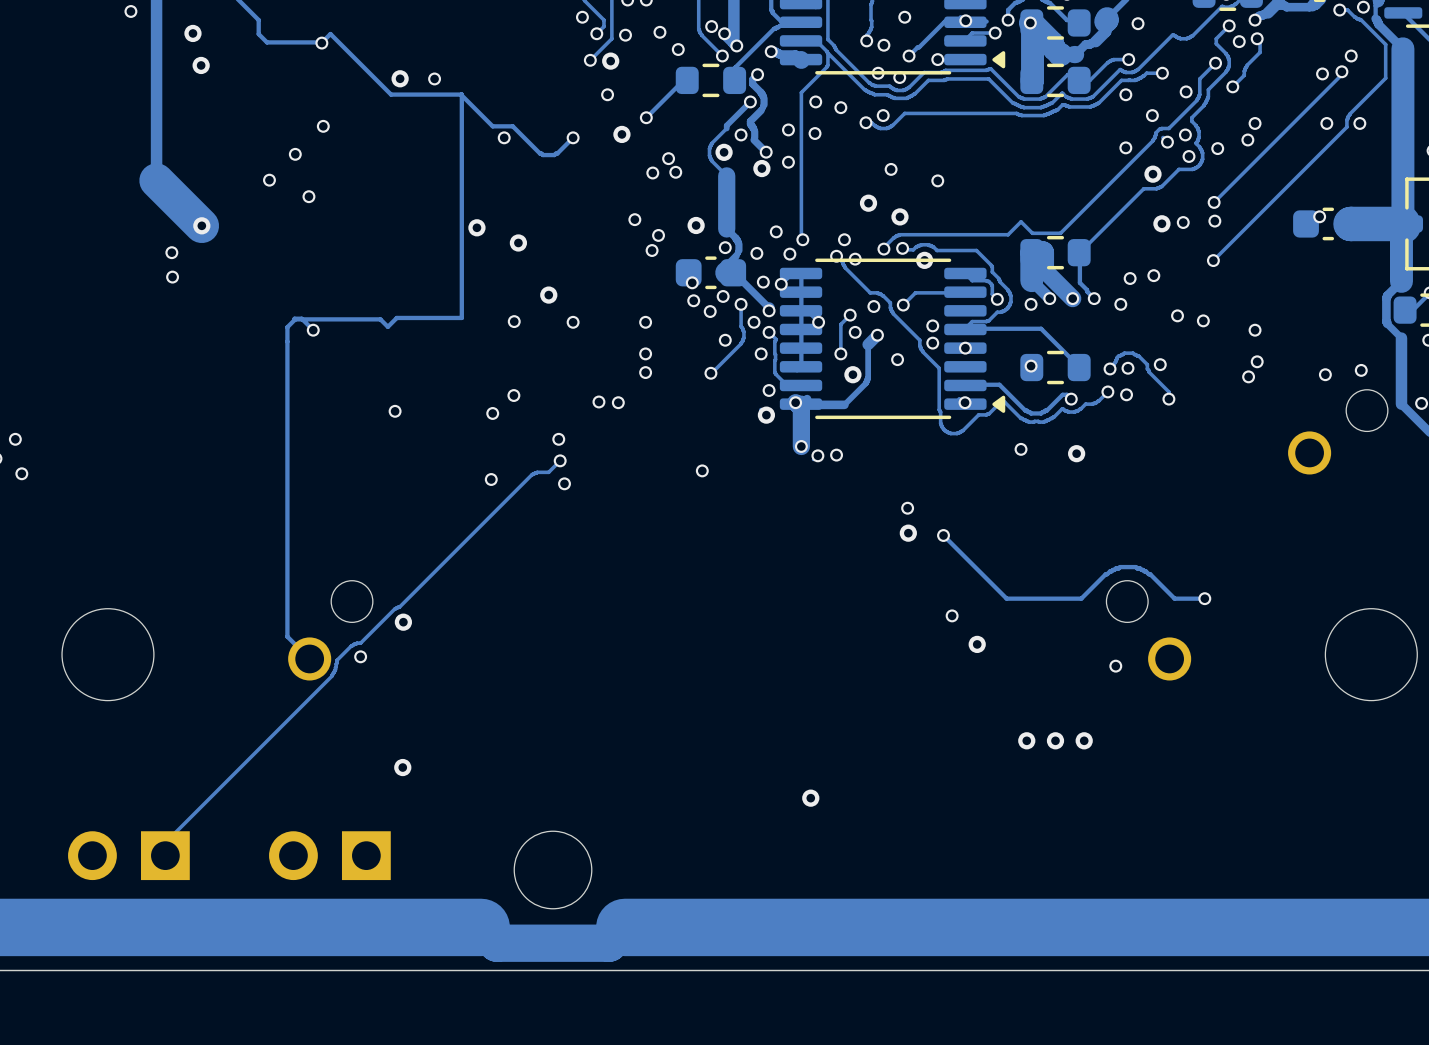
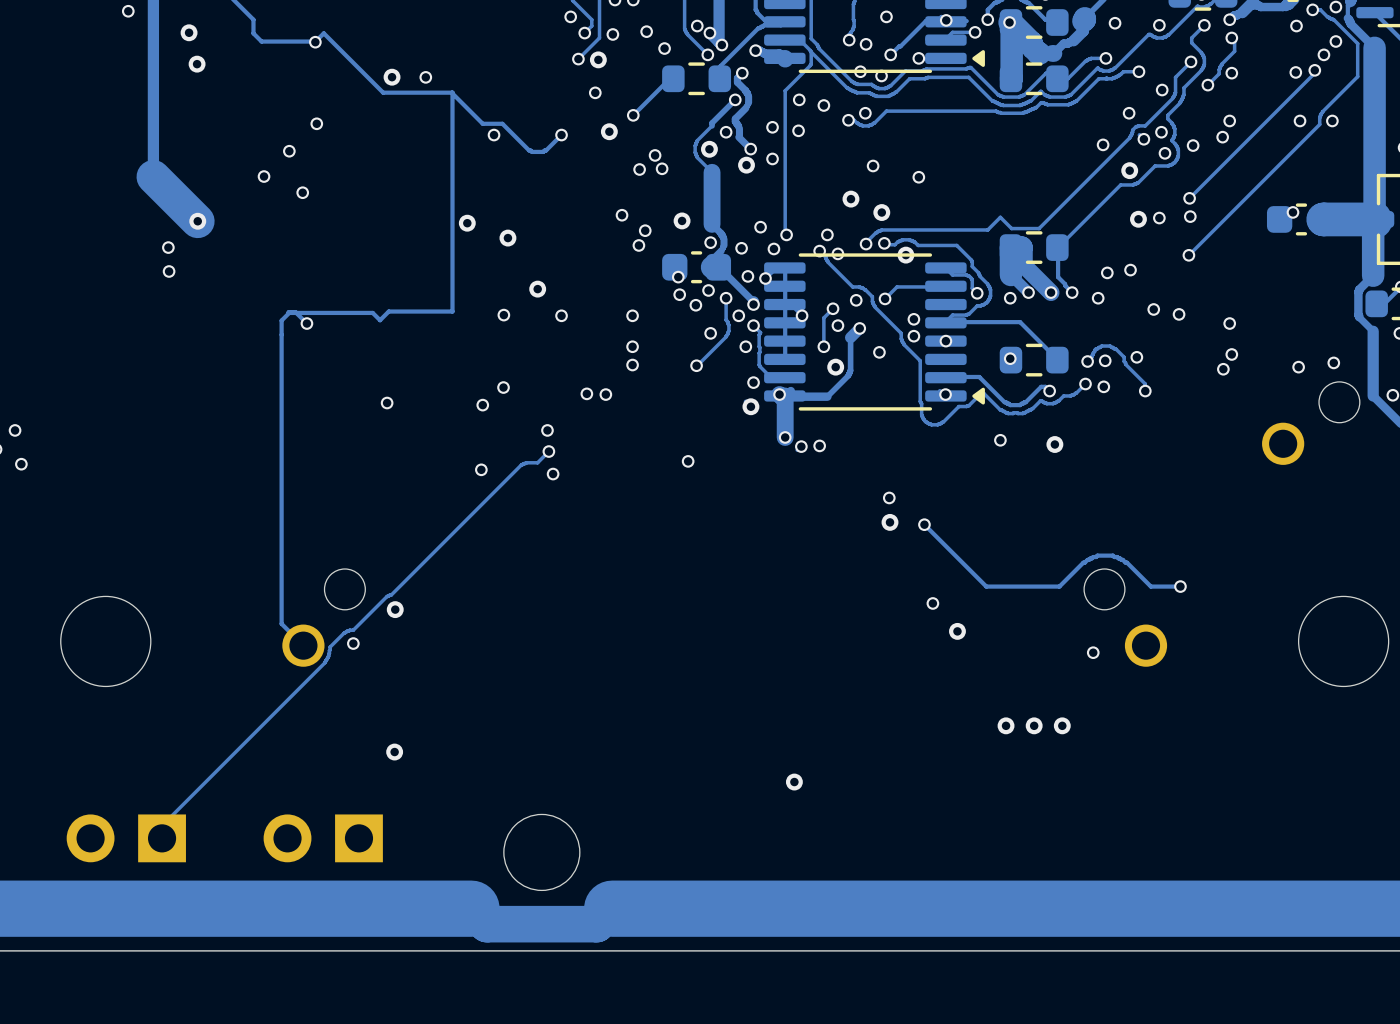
via: none -> (1159, 25)
via: none -> (1296, 26)
via: (1239, 41) -> none
via: none -> (1335, 41)
via: none -> (1231, 73)
via: (1125, 94) -> none

